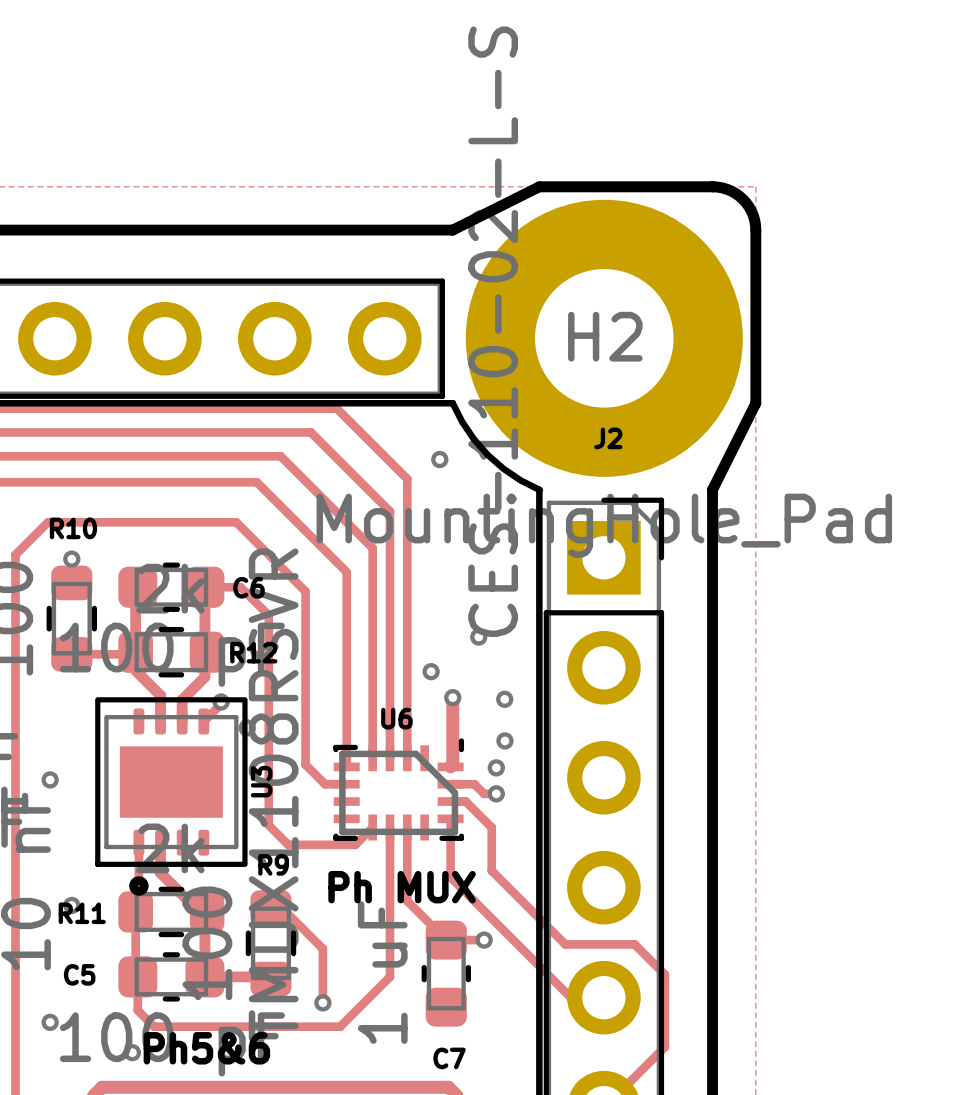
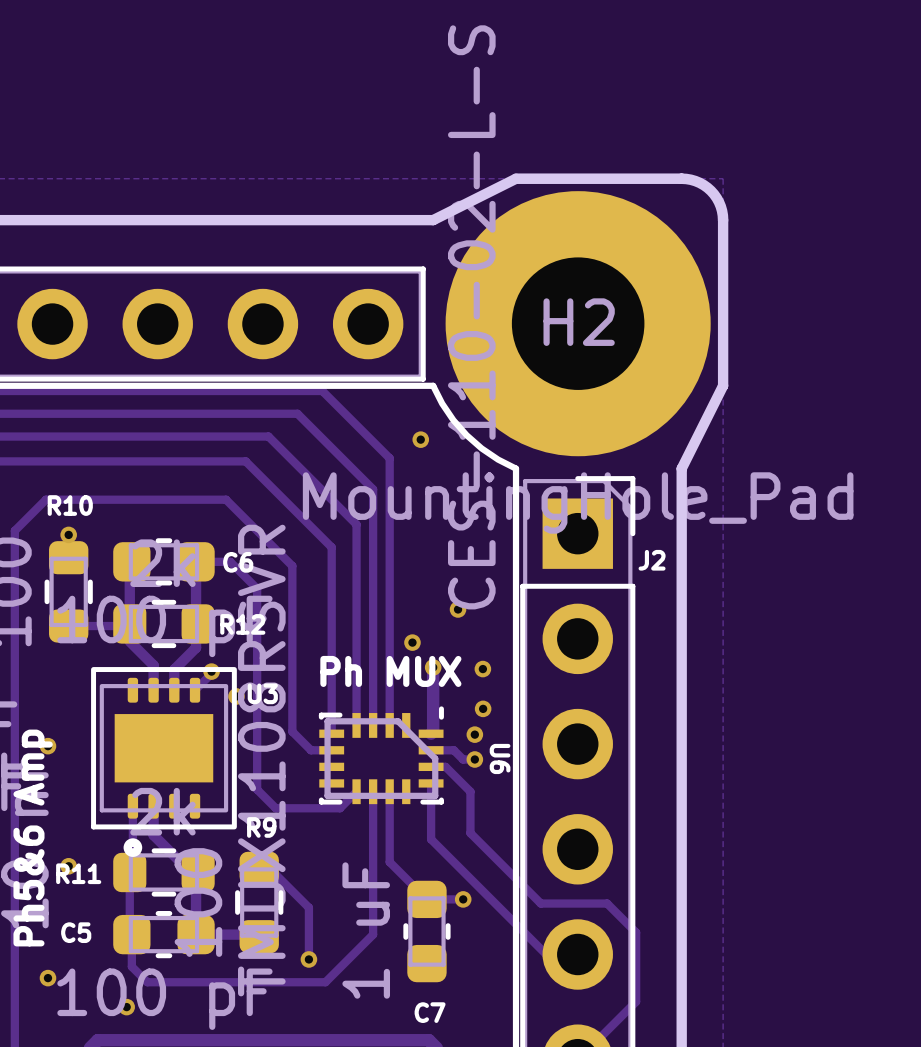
J2 name position: J2 (608, 438) -> J2 (652, 560)
U6 name rotation: 0° (396, 718) -> 90° clockwise (500, 758)
U6 name position: U6 (396, 718) -> U6 (500, 758)
U3 name rotation: 0° (261, 781) -> 90° clockwise (262, 693)
U3 name position: U3 (261, 781) -> U3 (262, 693)
text: none -> Ph5&6 Amp (33, 838)
text position: Ph MUX (402, 887) -> Ph MUX (390, 671)
text: Ph5&6 (206, 1048) -> none

